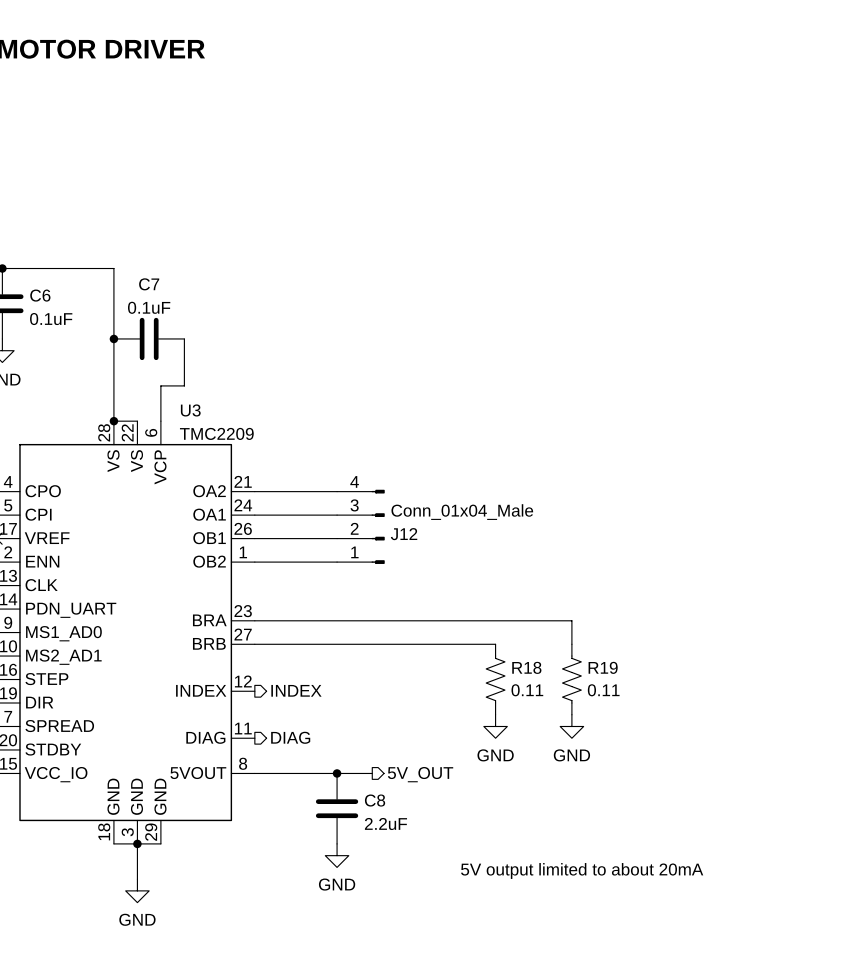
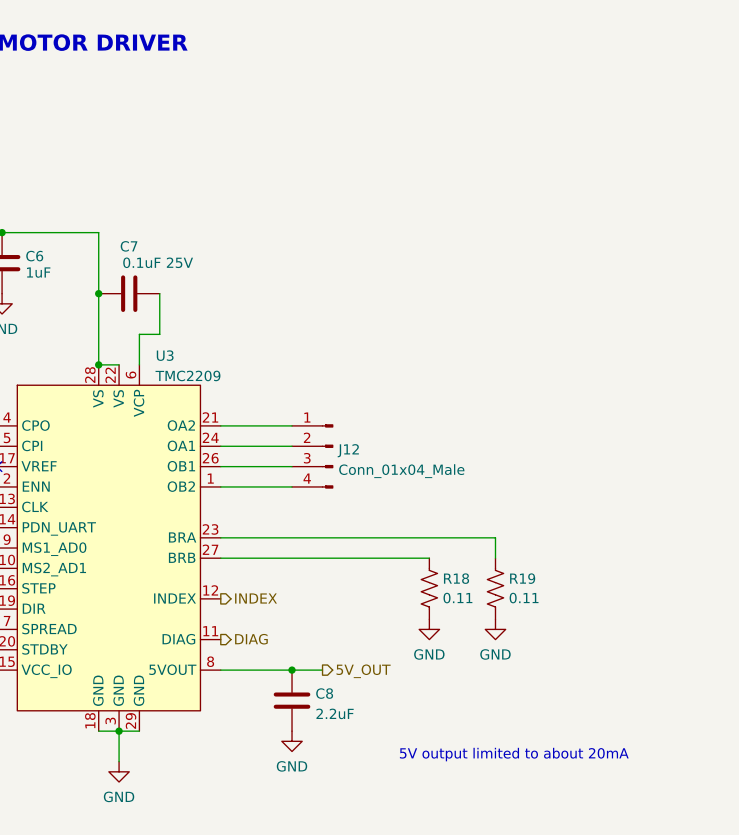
C7 value: 0.1uF (149, 307) -> 0.1uF 25V (158, 262)
C6 value: 0.1uF (51, 319) -> 1uF (38, 272)
J12 flip: as is (378, 526) -> up-down (327, 456)

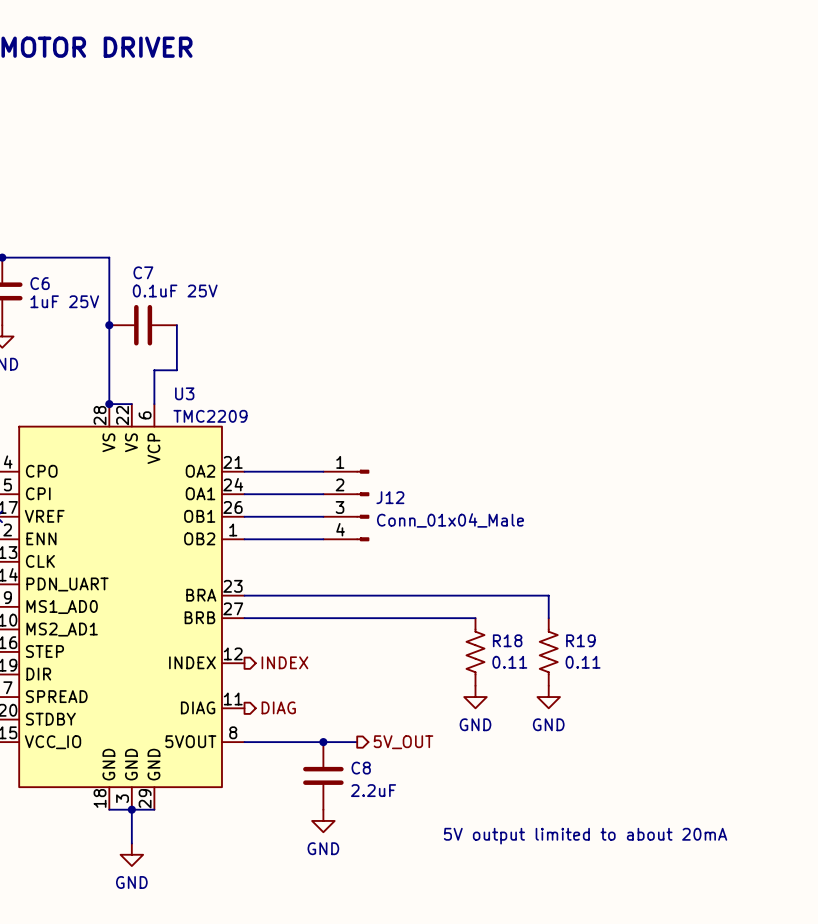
C6 value: 1uF (38, 272) -> 1uF 25V (64, 301)

